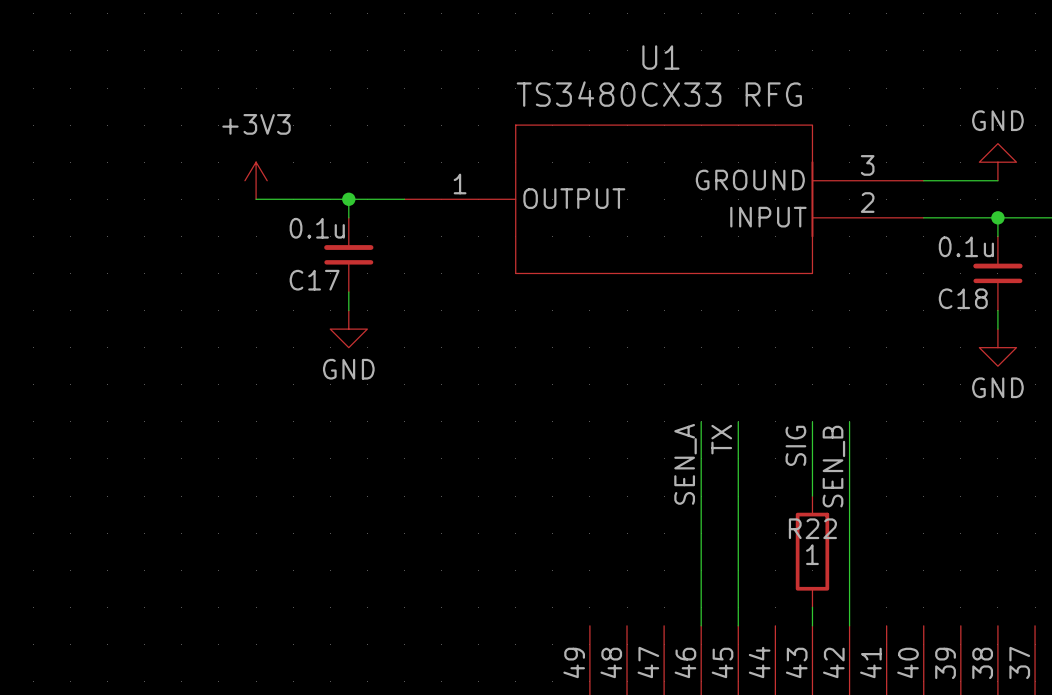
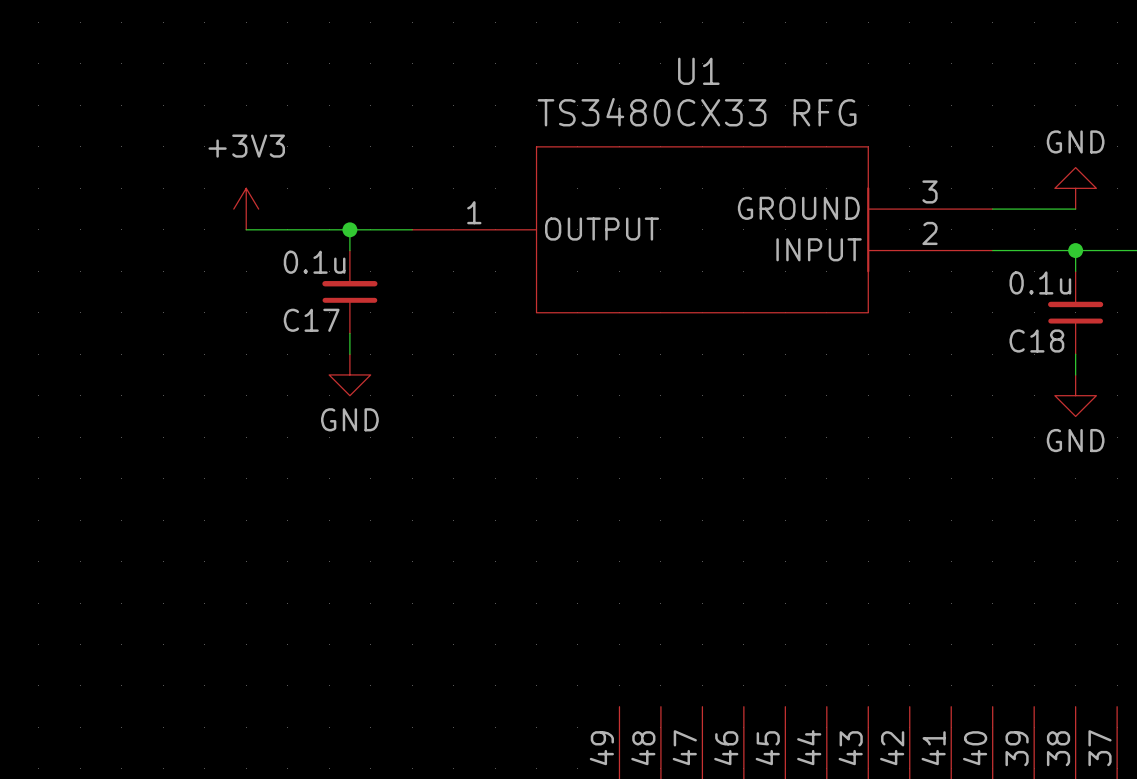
wire: (701, 421) (701, 625) -> none
wire: (738, 421) (738, 625) -> none
wire: (812, 421) (812, 496) -> none
wire: (849, 421) (849, 625) -> none
label: TX (721, 439) -> none
label: SIG (795, 445) -> none
label: SEN_A (685, 464) -> none
label: SEN_B (833, 466) -> none
R22: 1 (812, 551) -> none
wire: (812, 607) (812, 625) -> none

